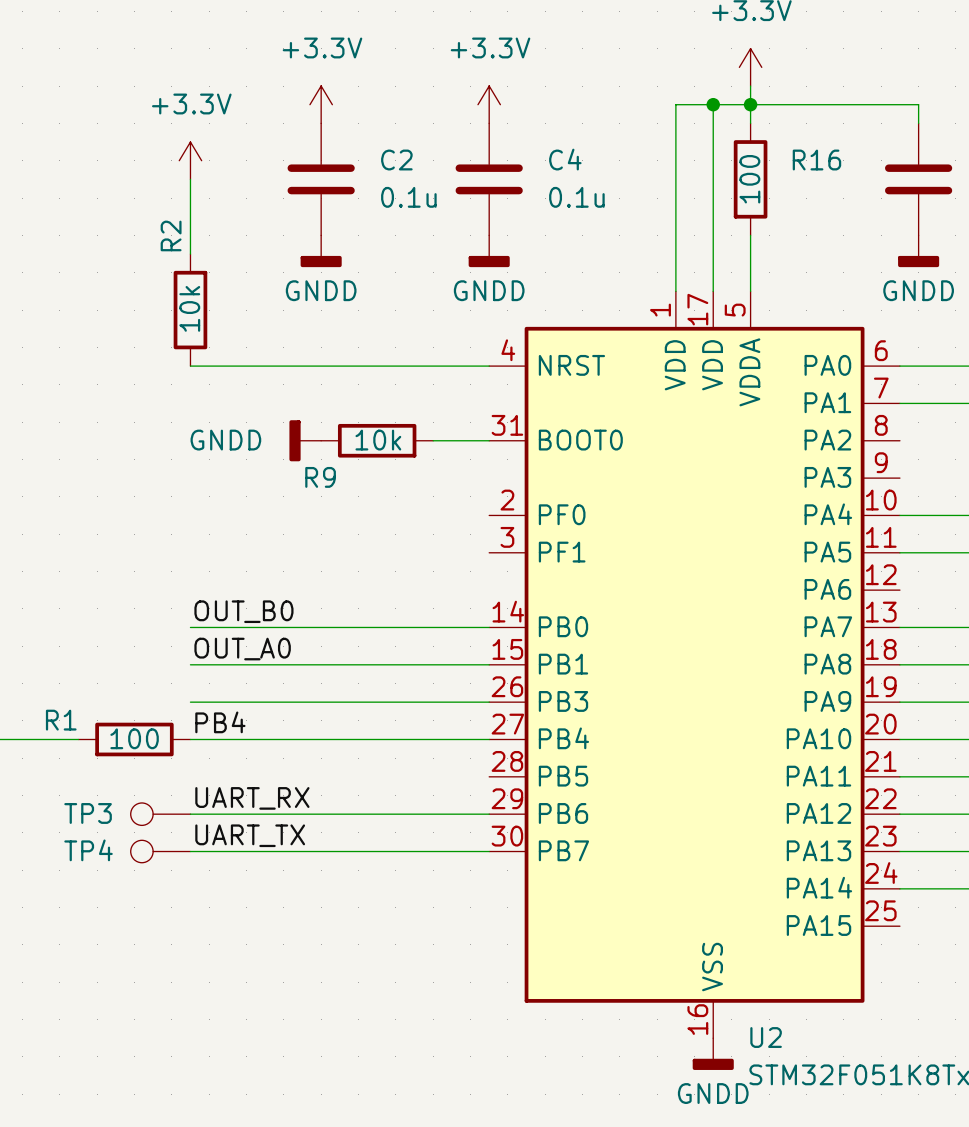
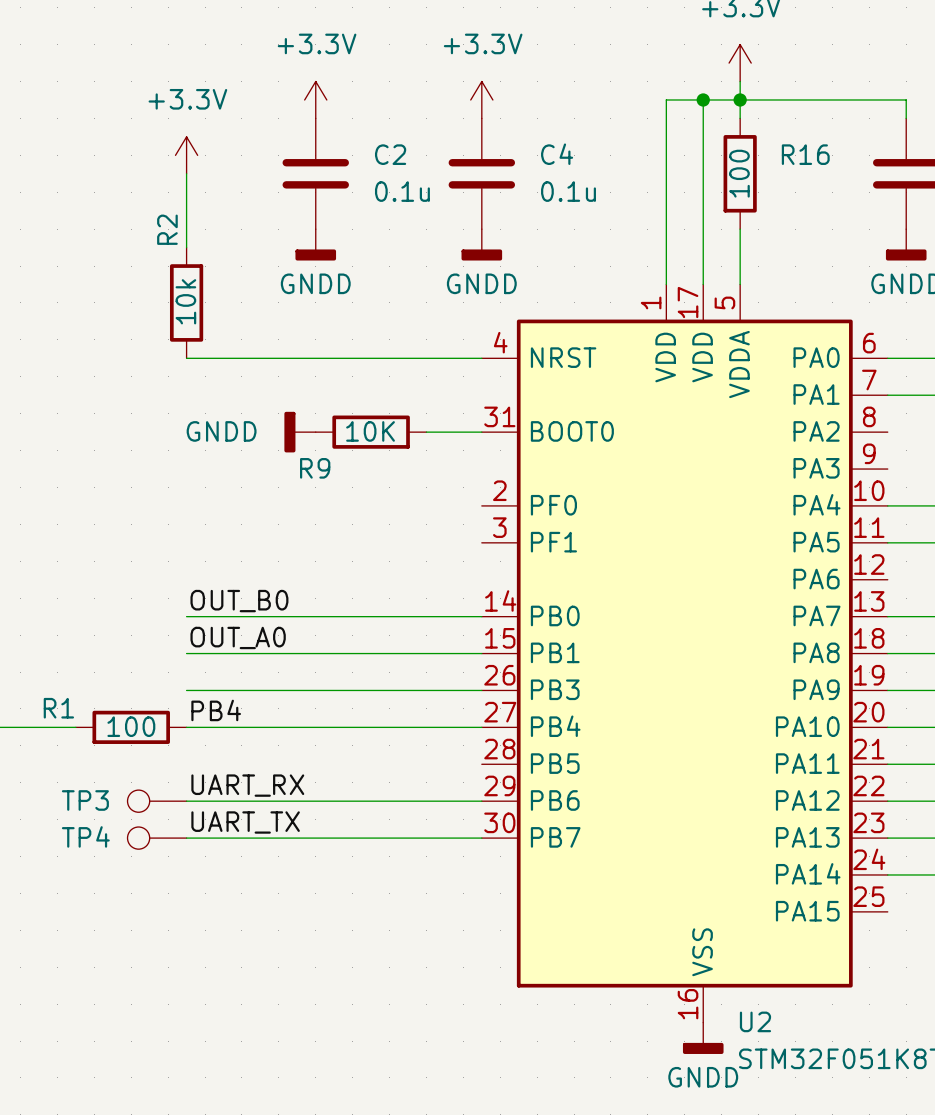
R9 value: 10k (378, 440) -> 10K (370, 431)

